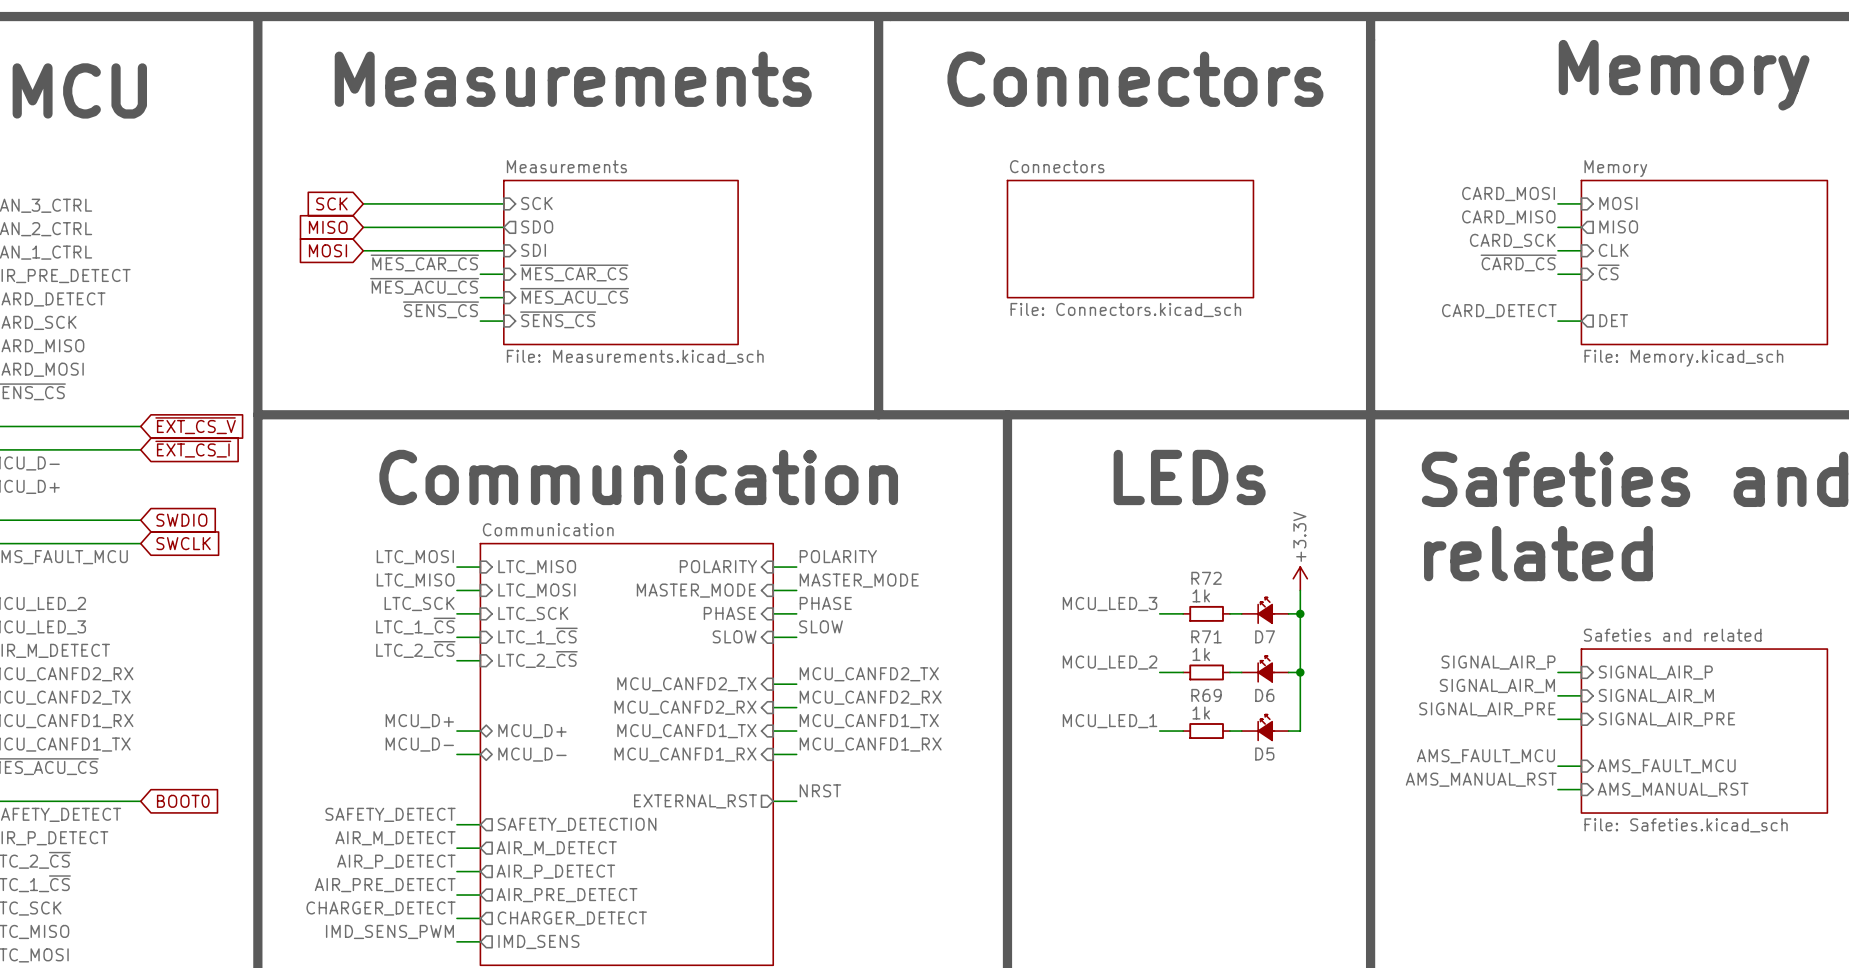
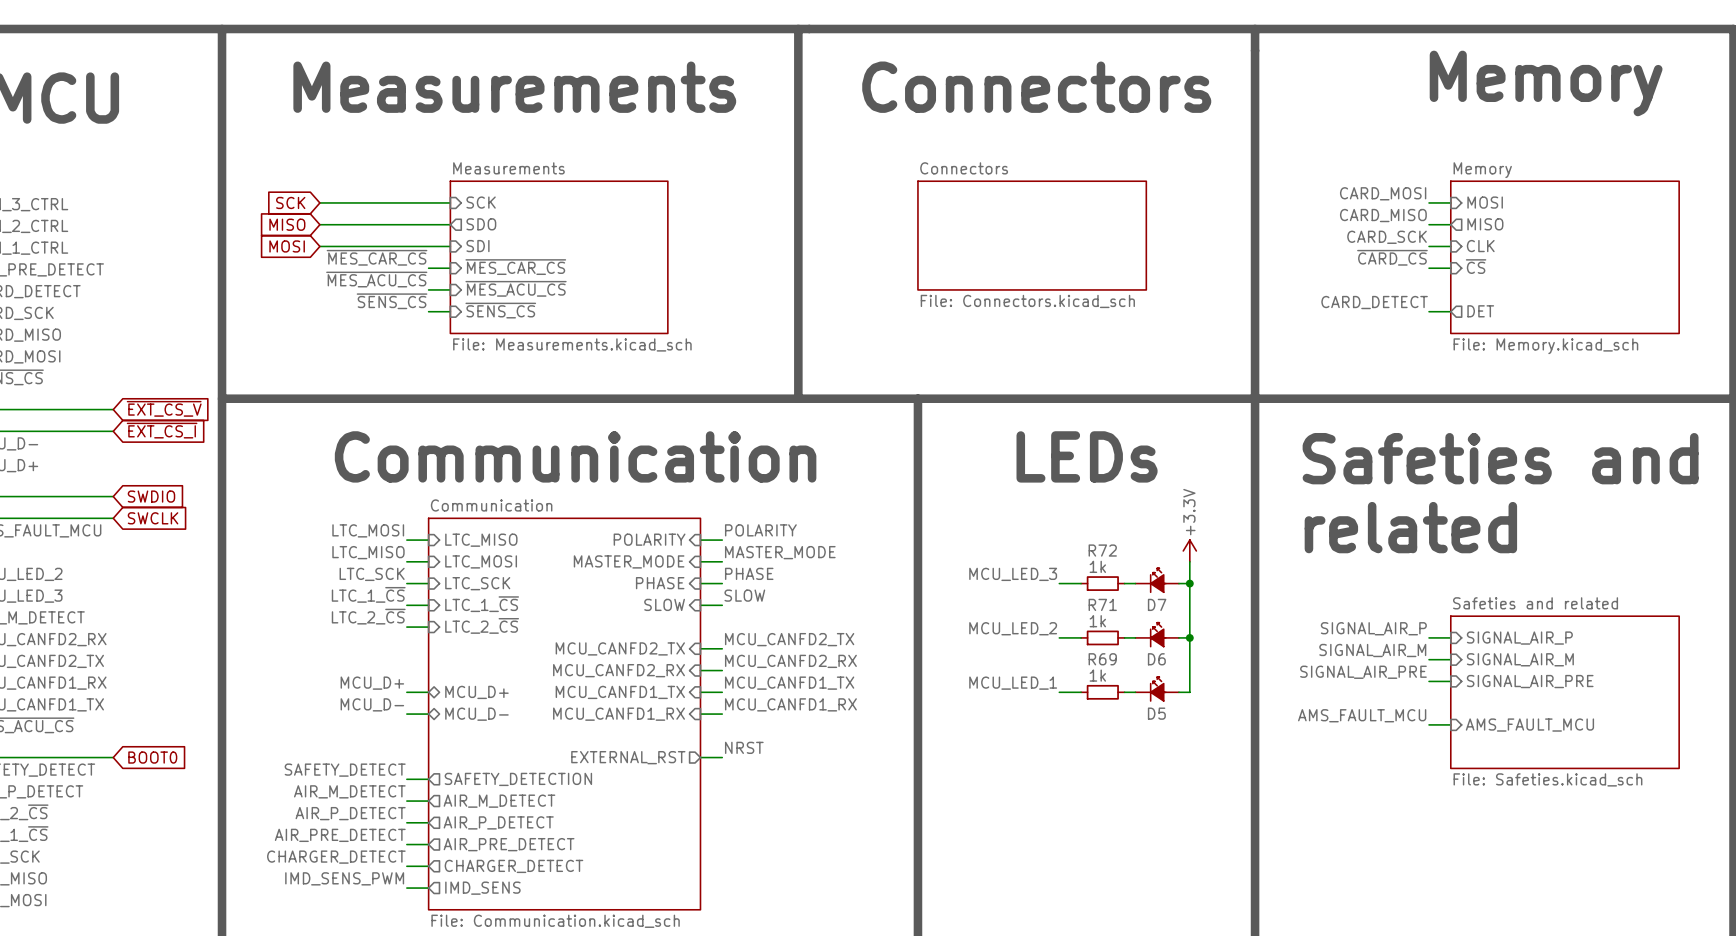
label: AMS_MANUAL_RST (1481, 779) -> none
wire: (1558, 789) (1581, 789) -> none
sheet pin: AMS_MANUAL_RST (1673, 789) -> none

